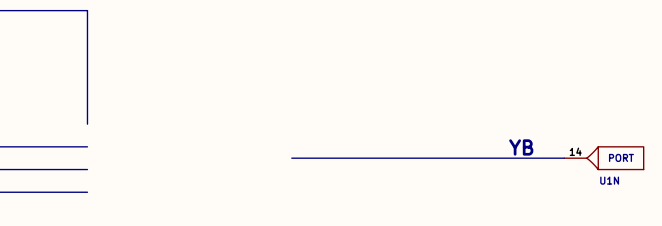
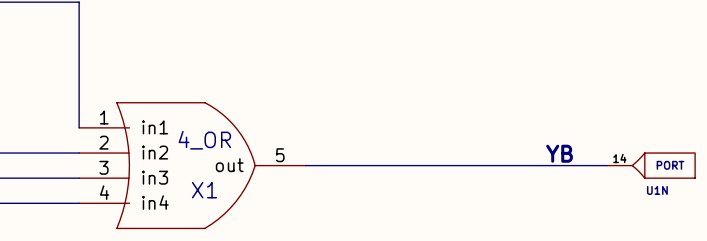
X1: none -> 4_OR (192, 165)

